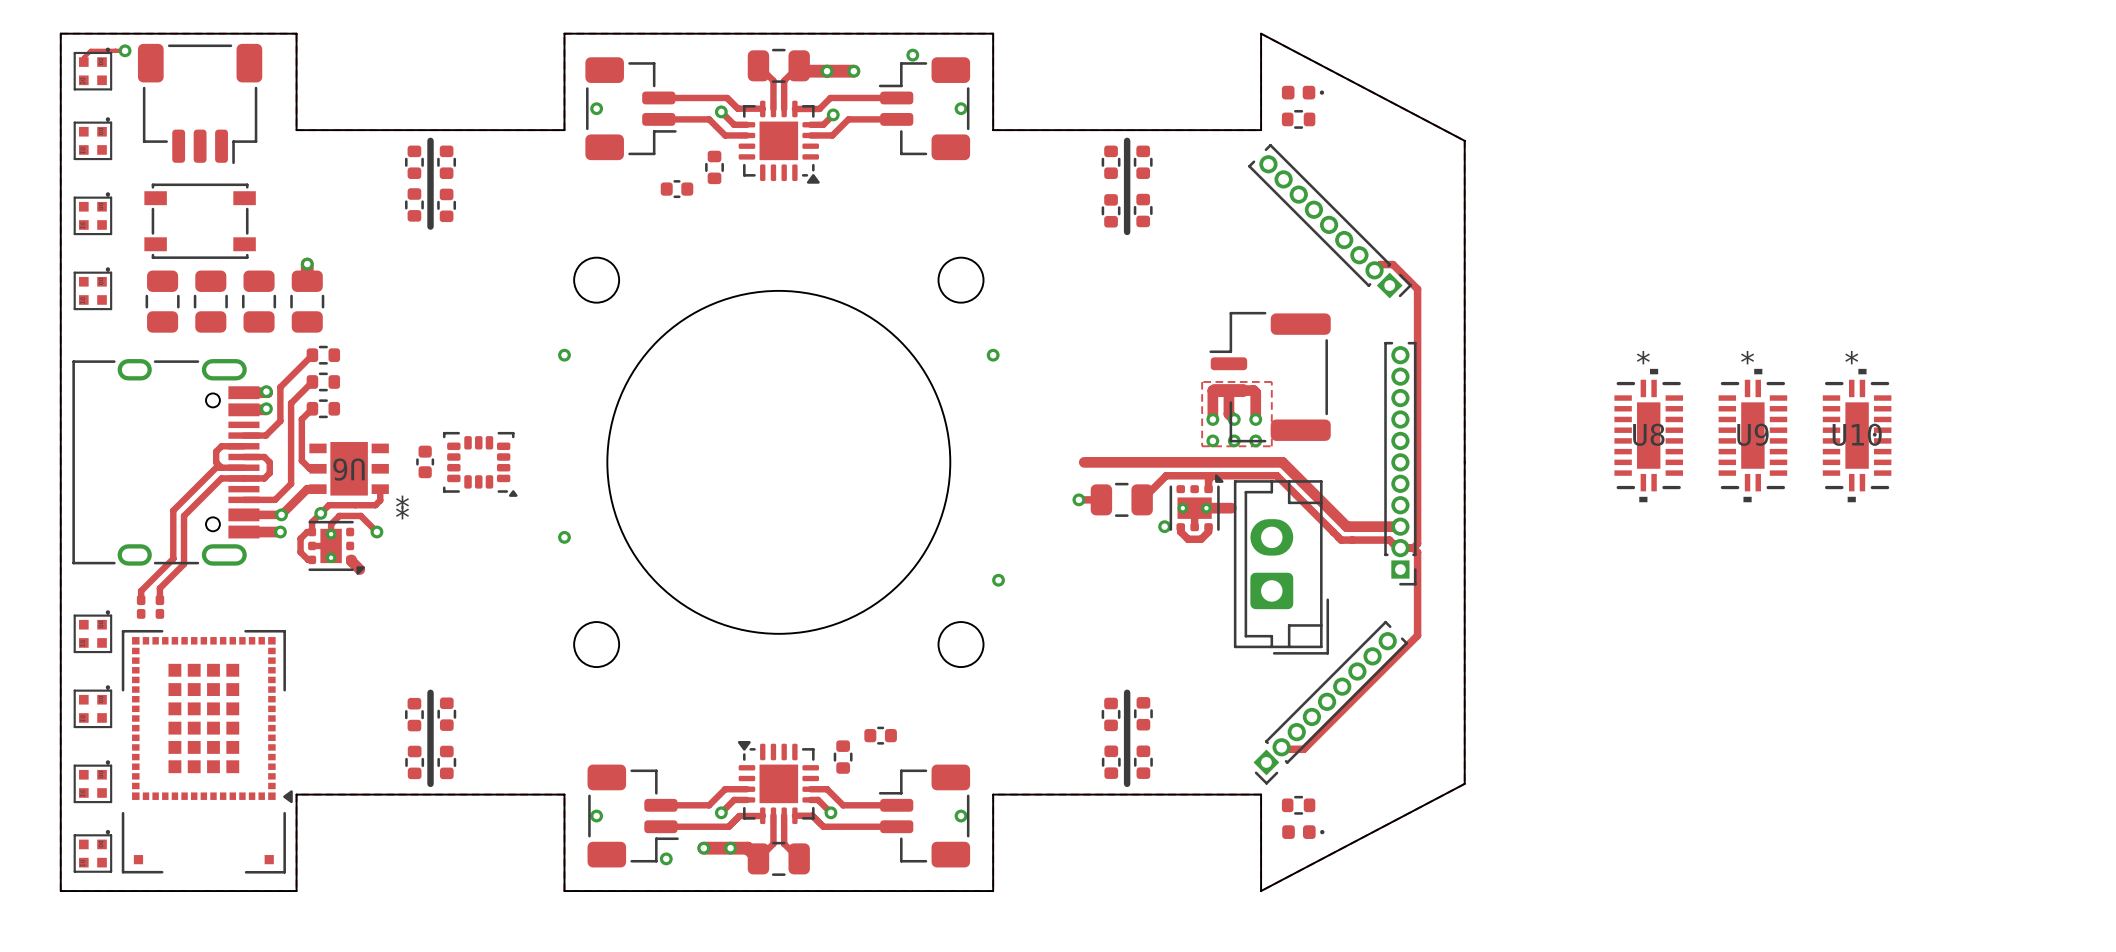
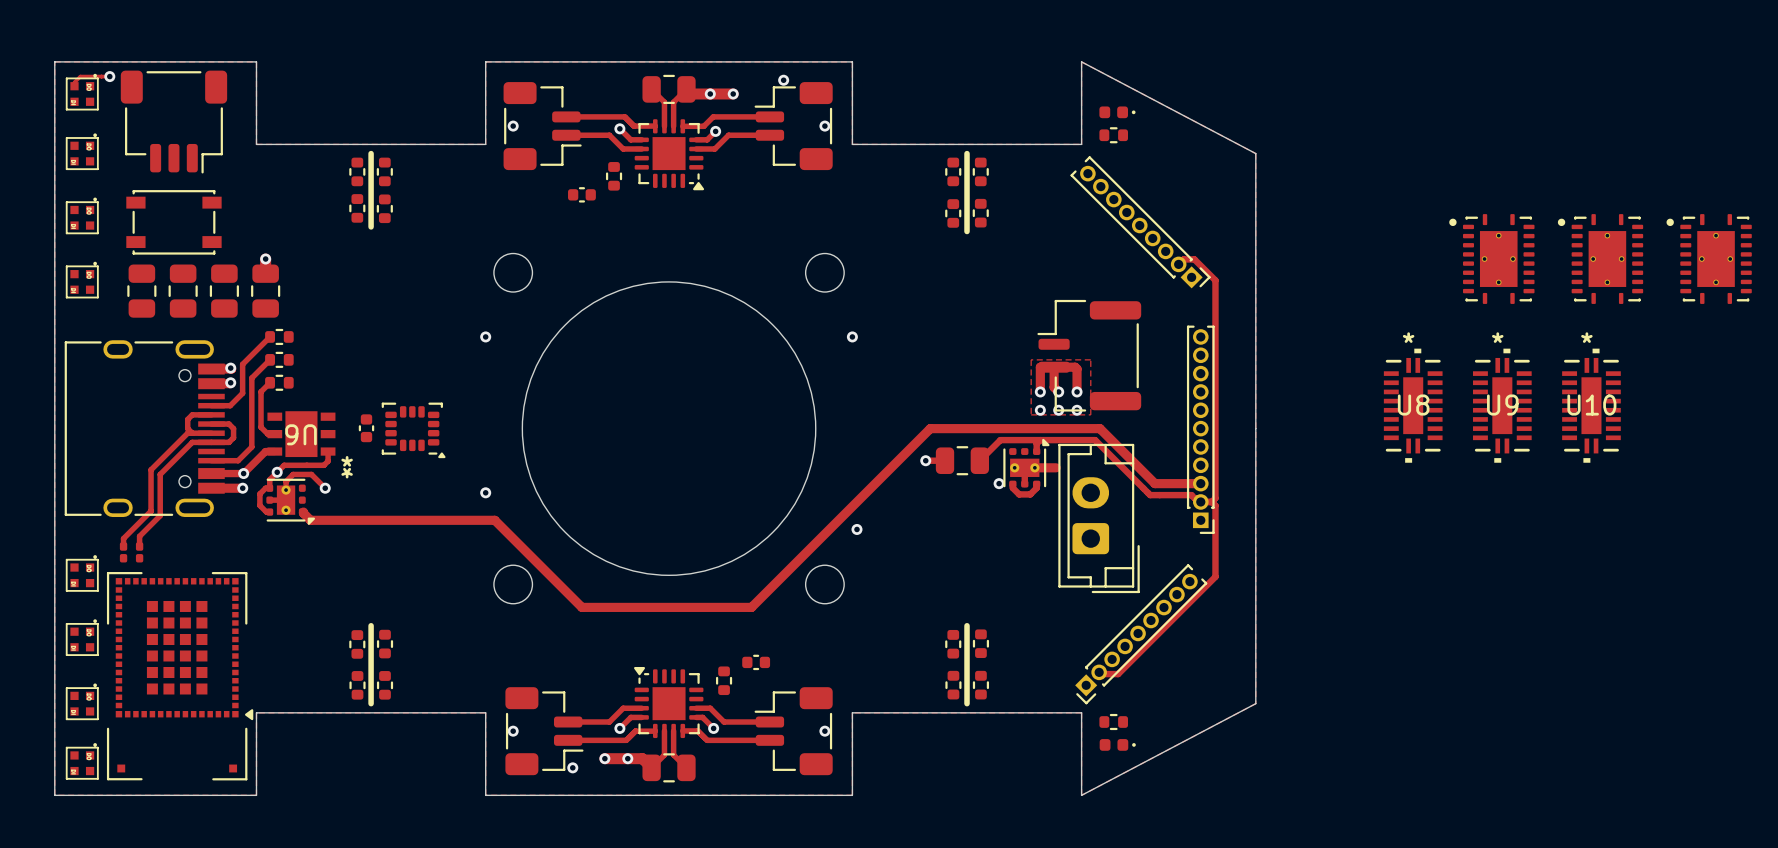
part: none -> (1491, 259)
part: none -> (1600, 259)
part: none -> (1709, 259)
track: none -> (930, 428) (751, 607) (581, 607) (494, 520) (310, 520)

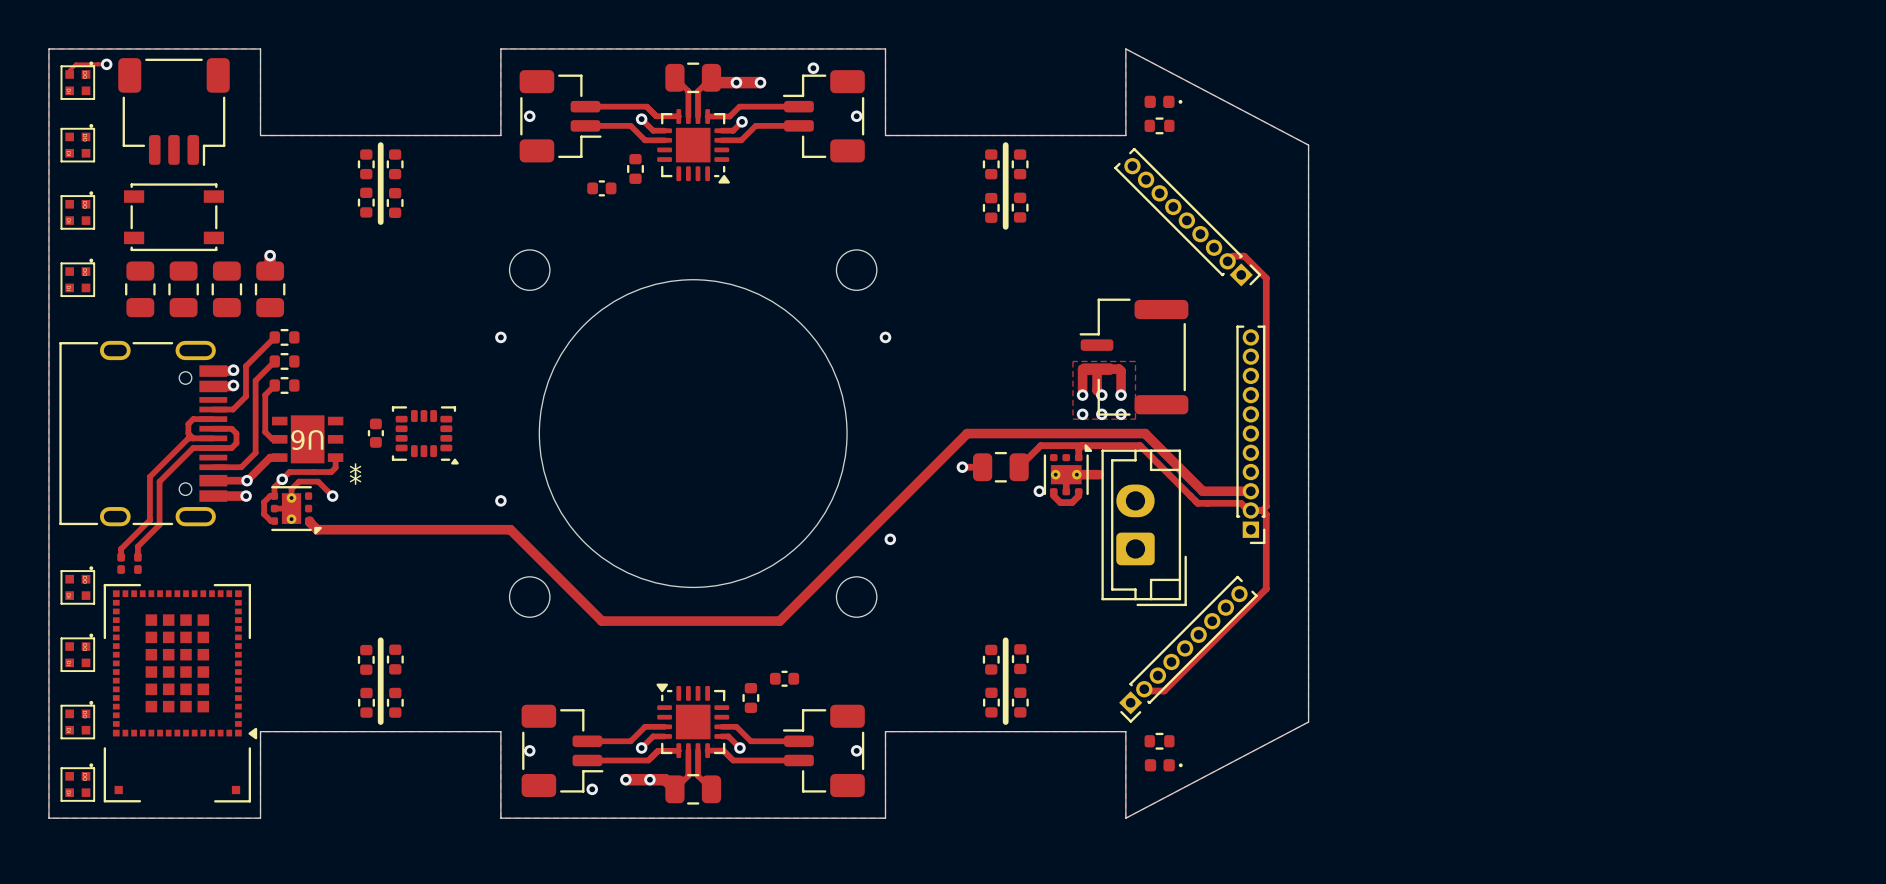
part: (1491, 259) -> none
part: (1600, 259) -> none
part: (1709, 259) -> none
U8: (1413, 405) -> none
U9: (1502, 405) -> none
U10: (1591, 405) -> none

